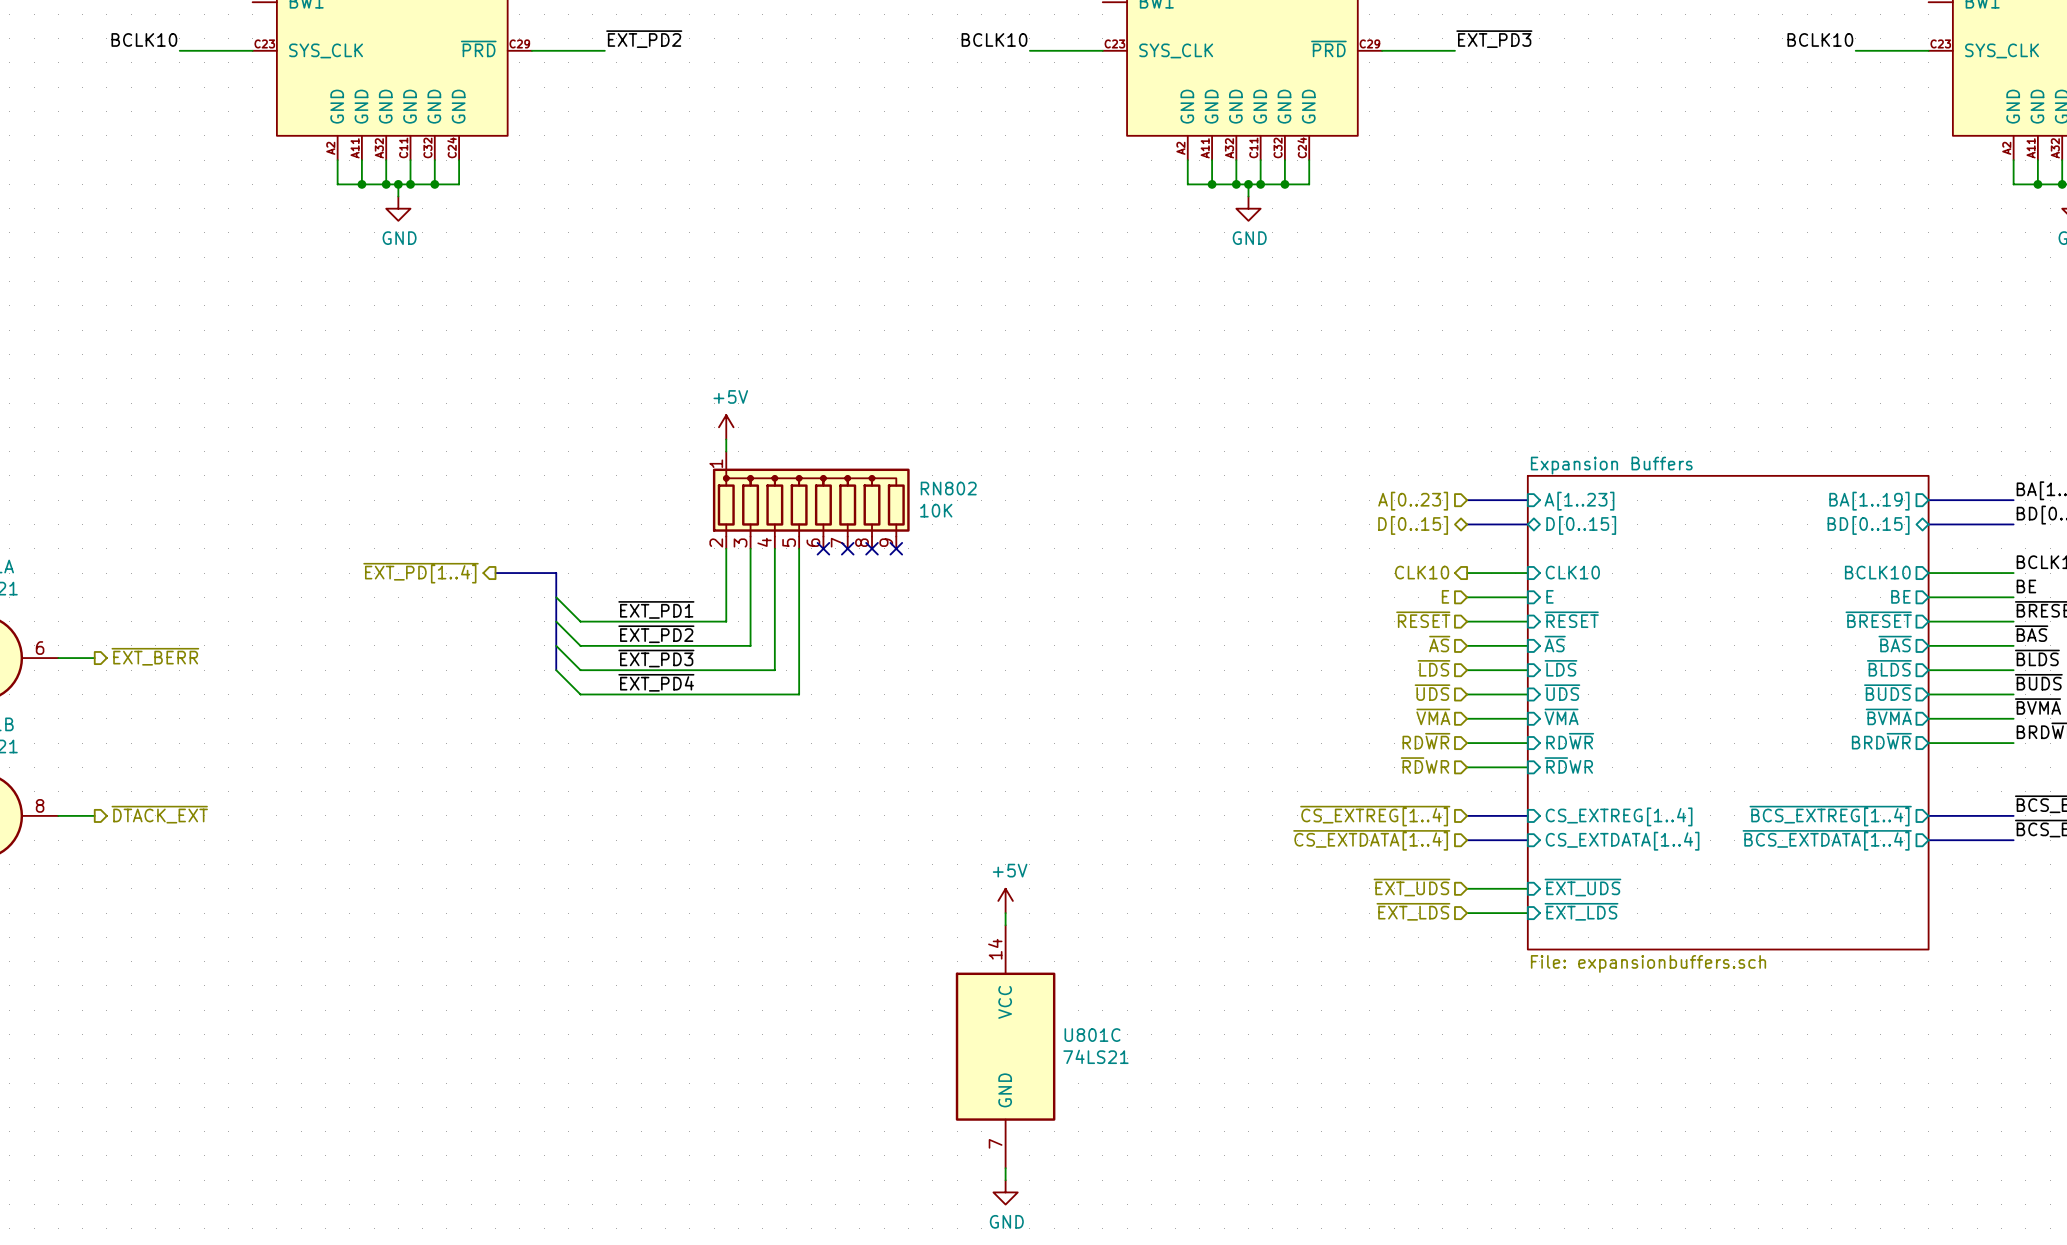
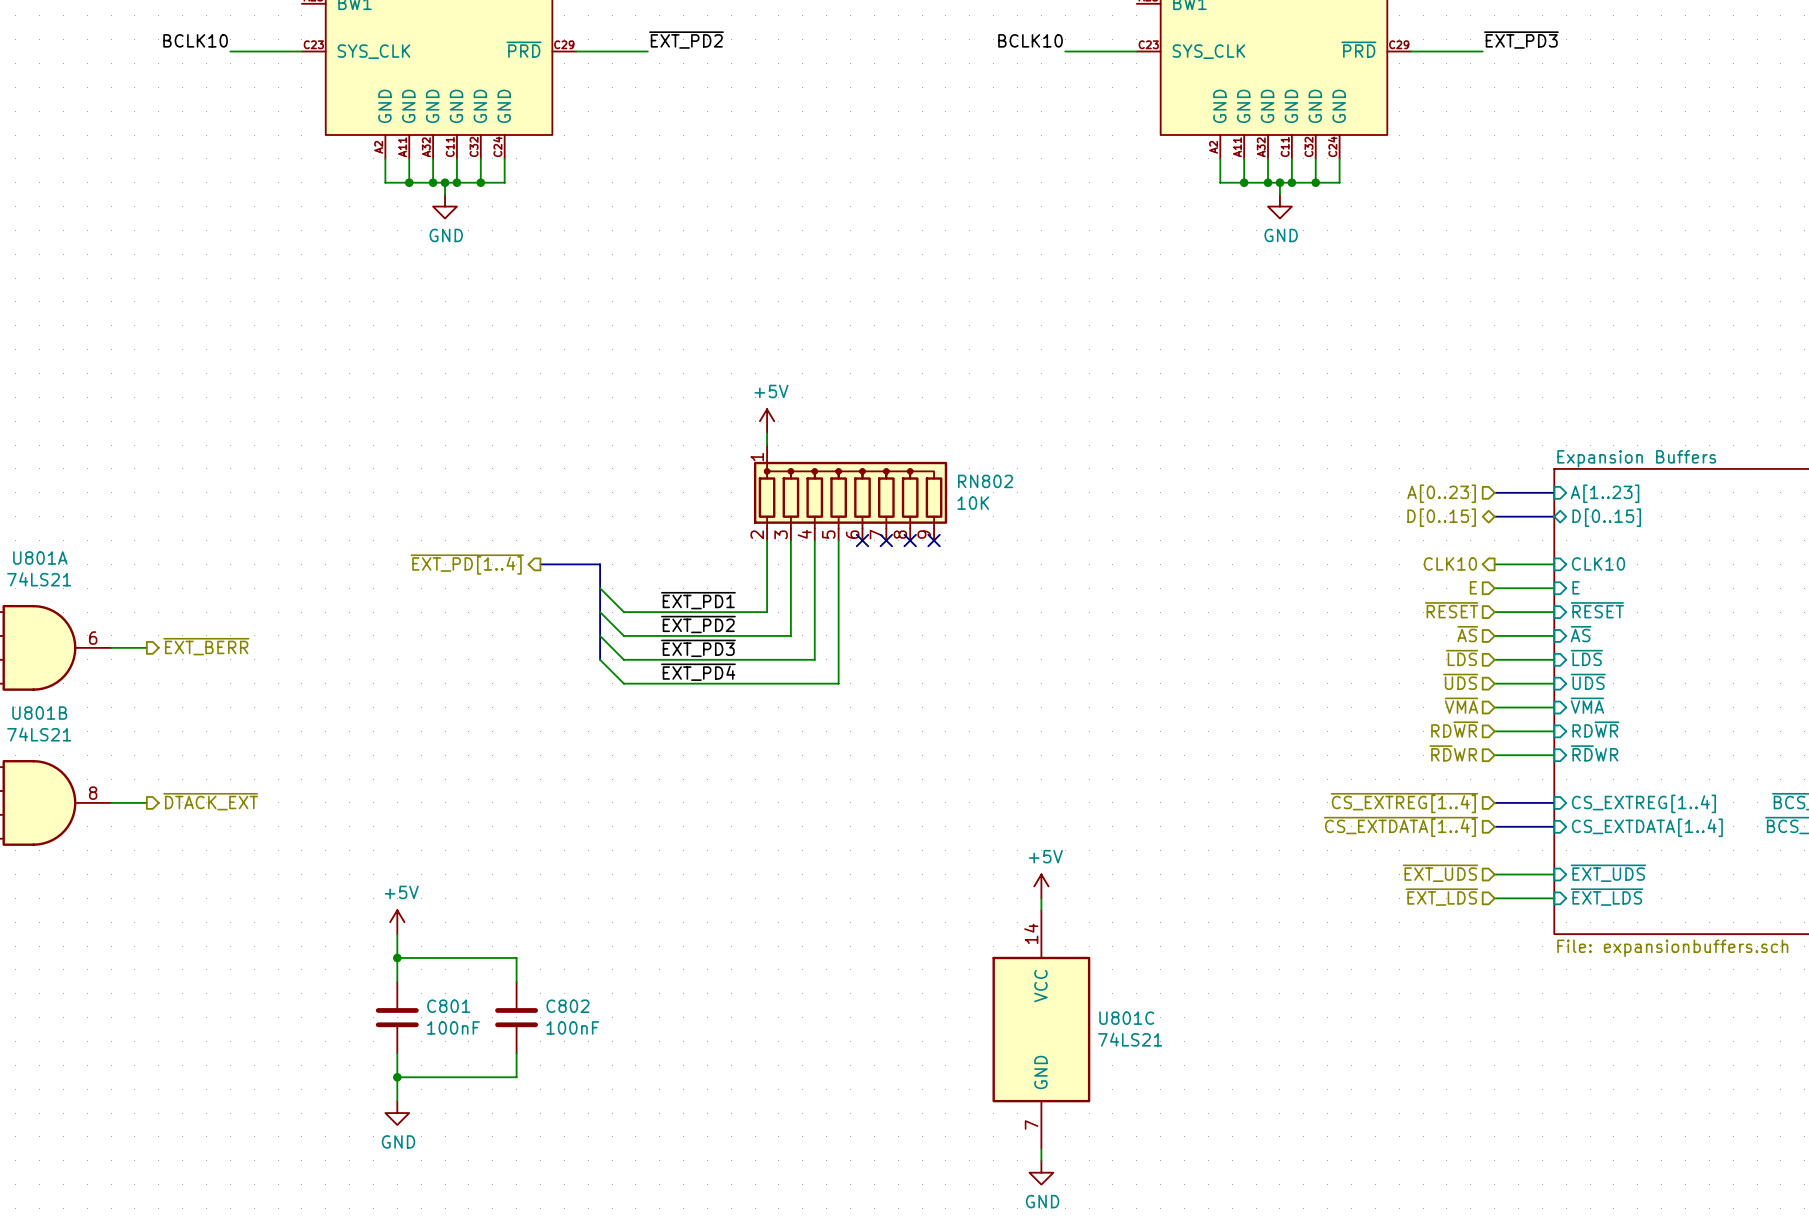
power symbol: none -> +5V (397, 922)
wire: none -> (397, 934) (397, 981)
wire: none -> (397, 958) (516, 958) (516, 981)
junction: none -> (397, 958)
C801: none -> 100nF (397, 1017)
C802: none -> 100nF (516, 1017)
wire: none -> (397, 1053) (397, 1101)
wire: none -> (516, 1053) (516, 1077) (397, 1077)
junction: none -> (397, 1077)
power symbol: none -> GND (397, 1113)

